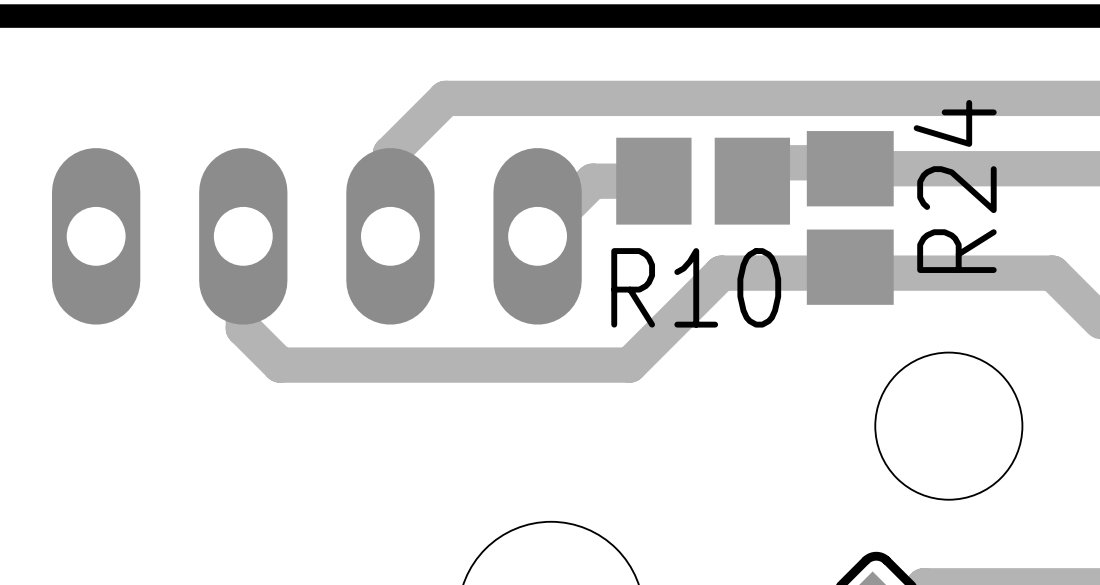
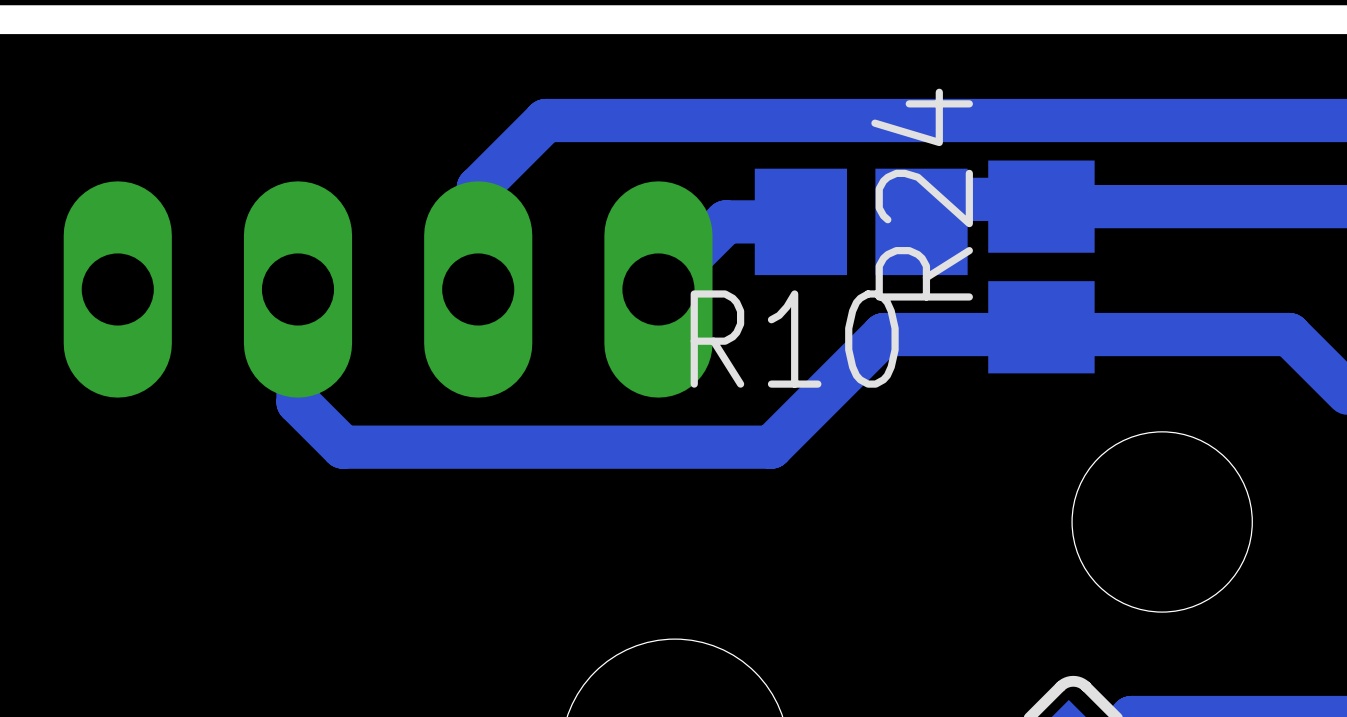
R24 name position: R24 (955, 186) -> R24 (922, 194)
R10 name position: R10 (696, 287) -> R10 (794, 339)

